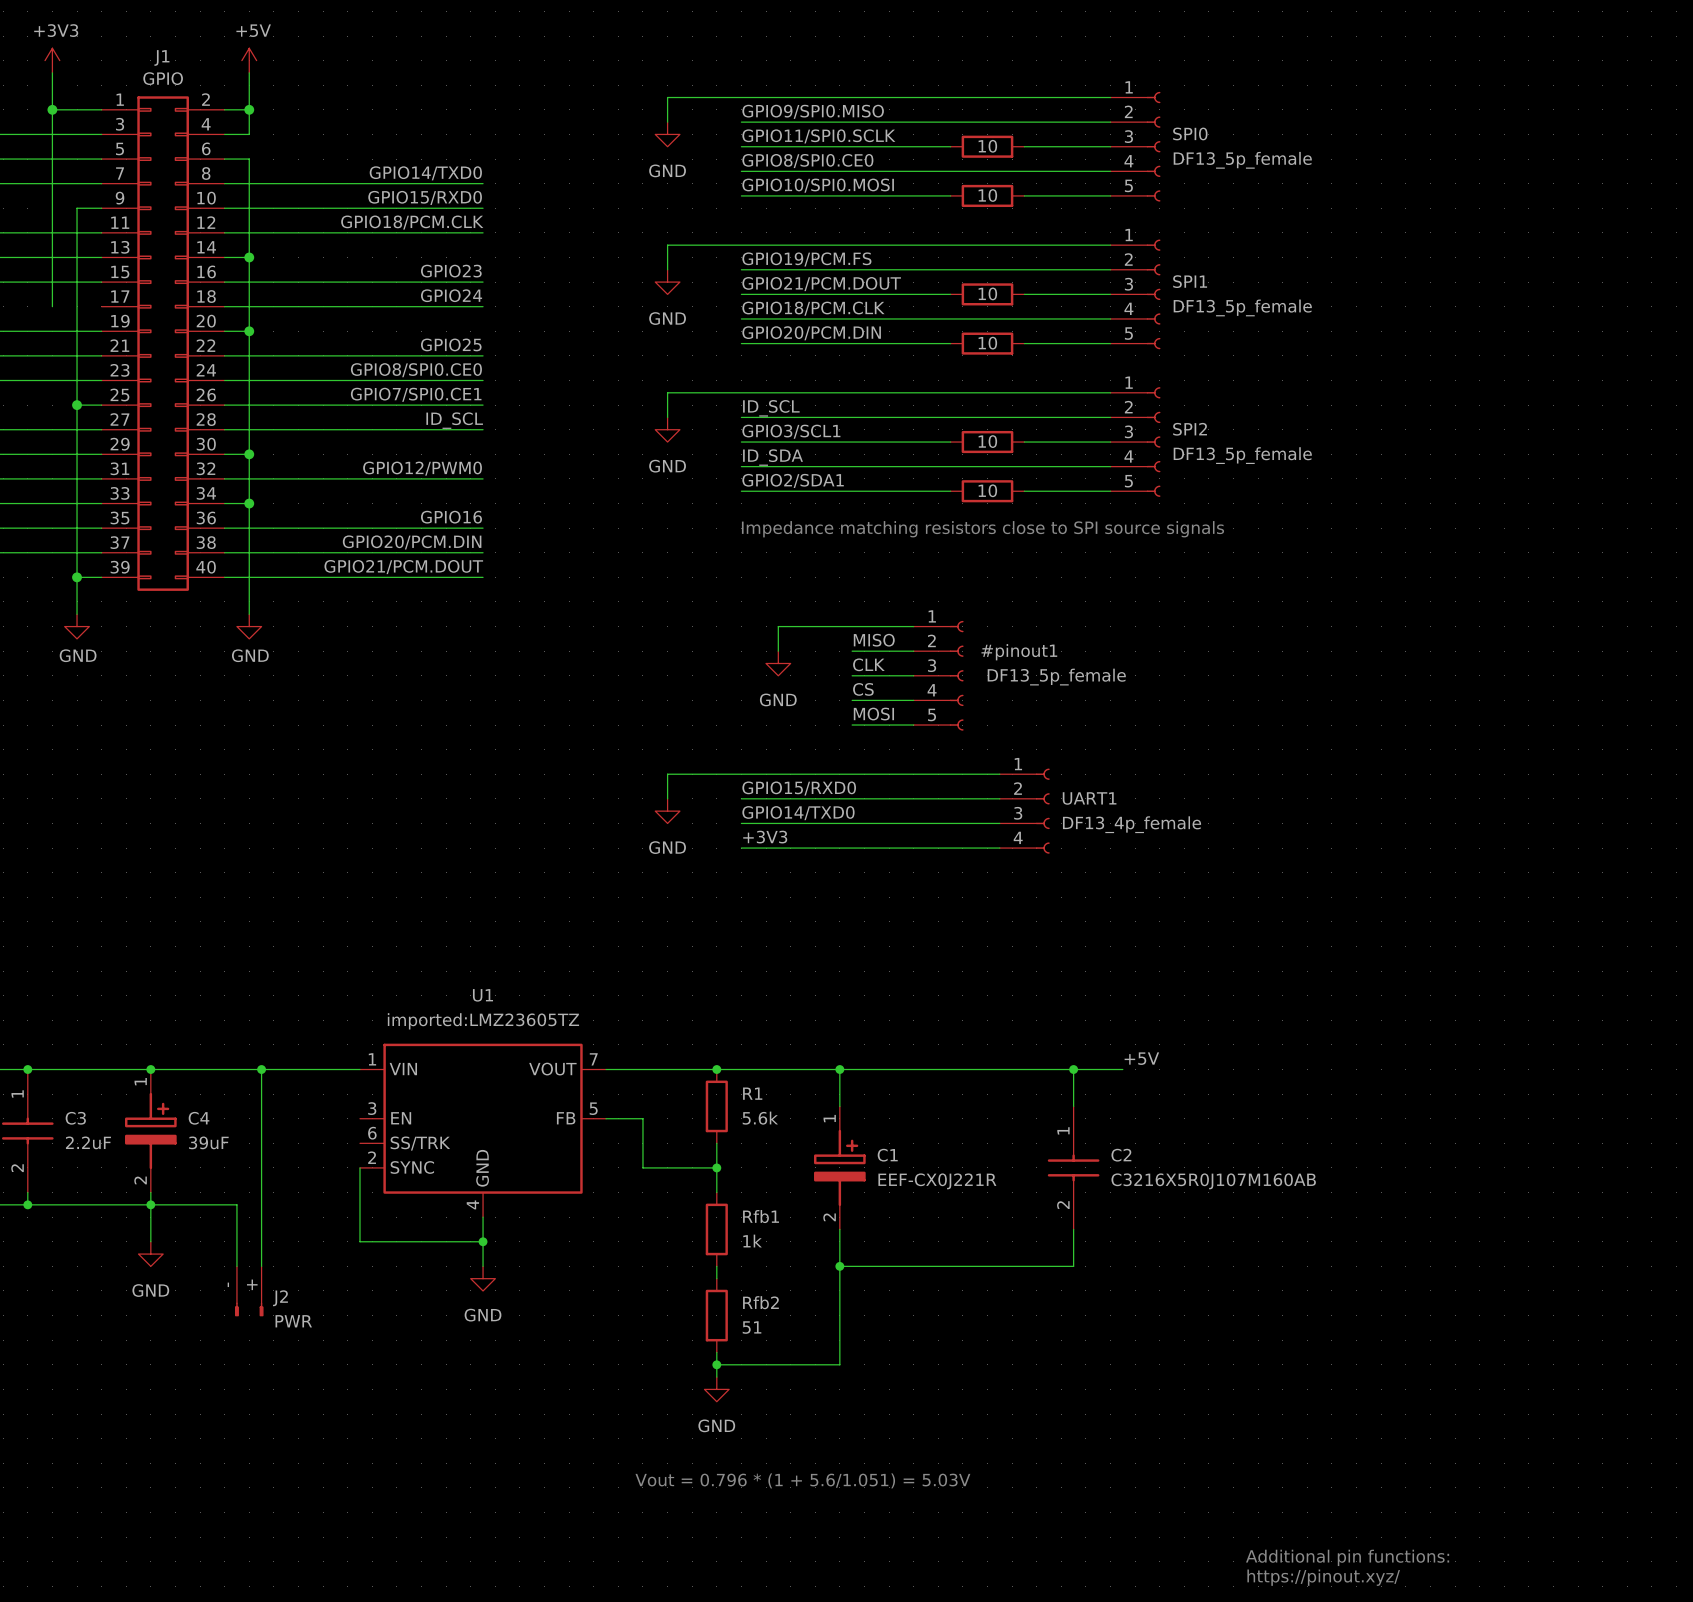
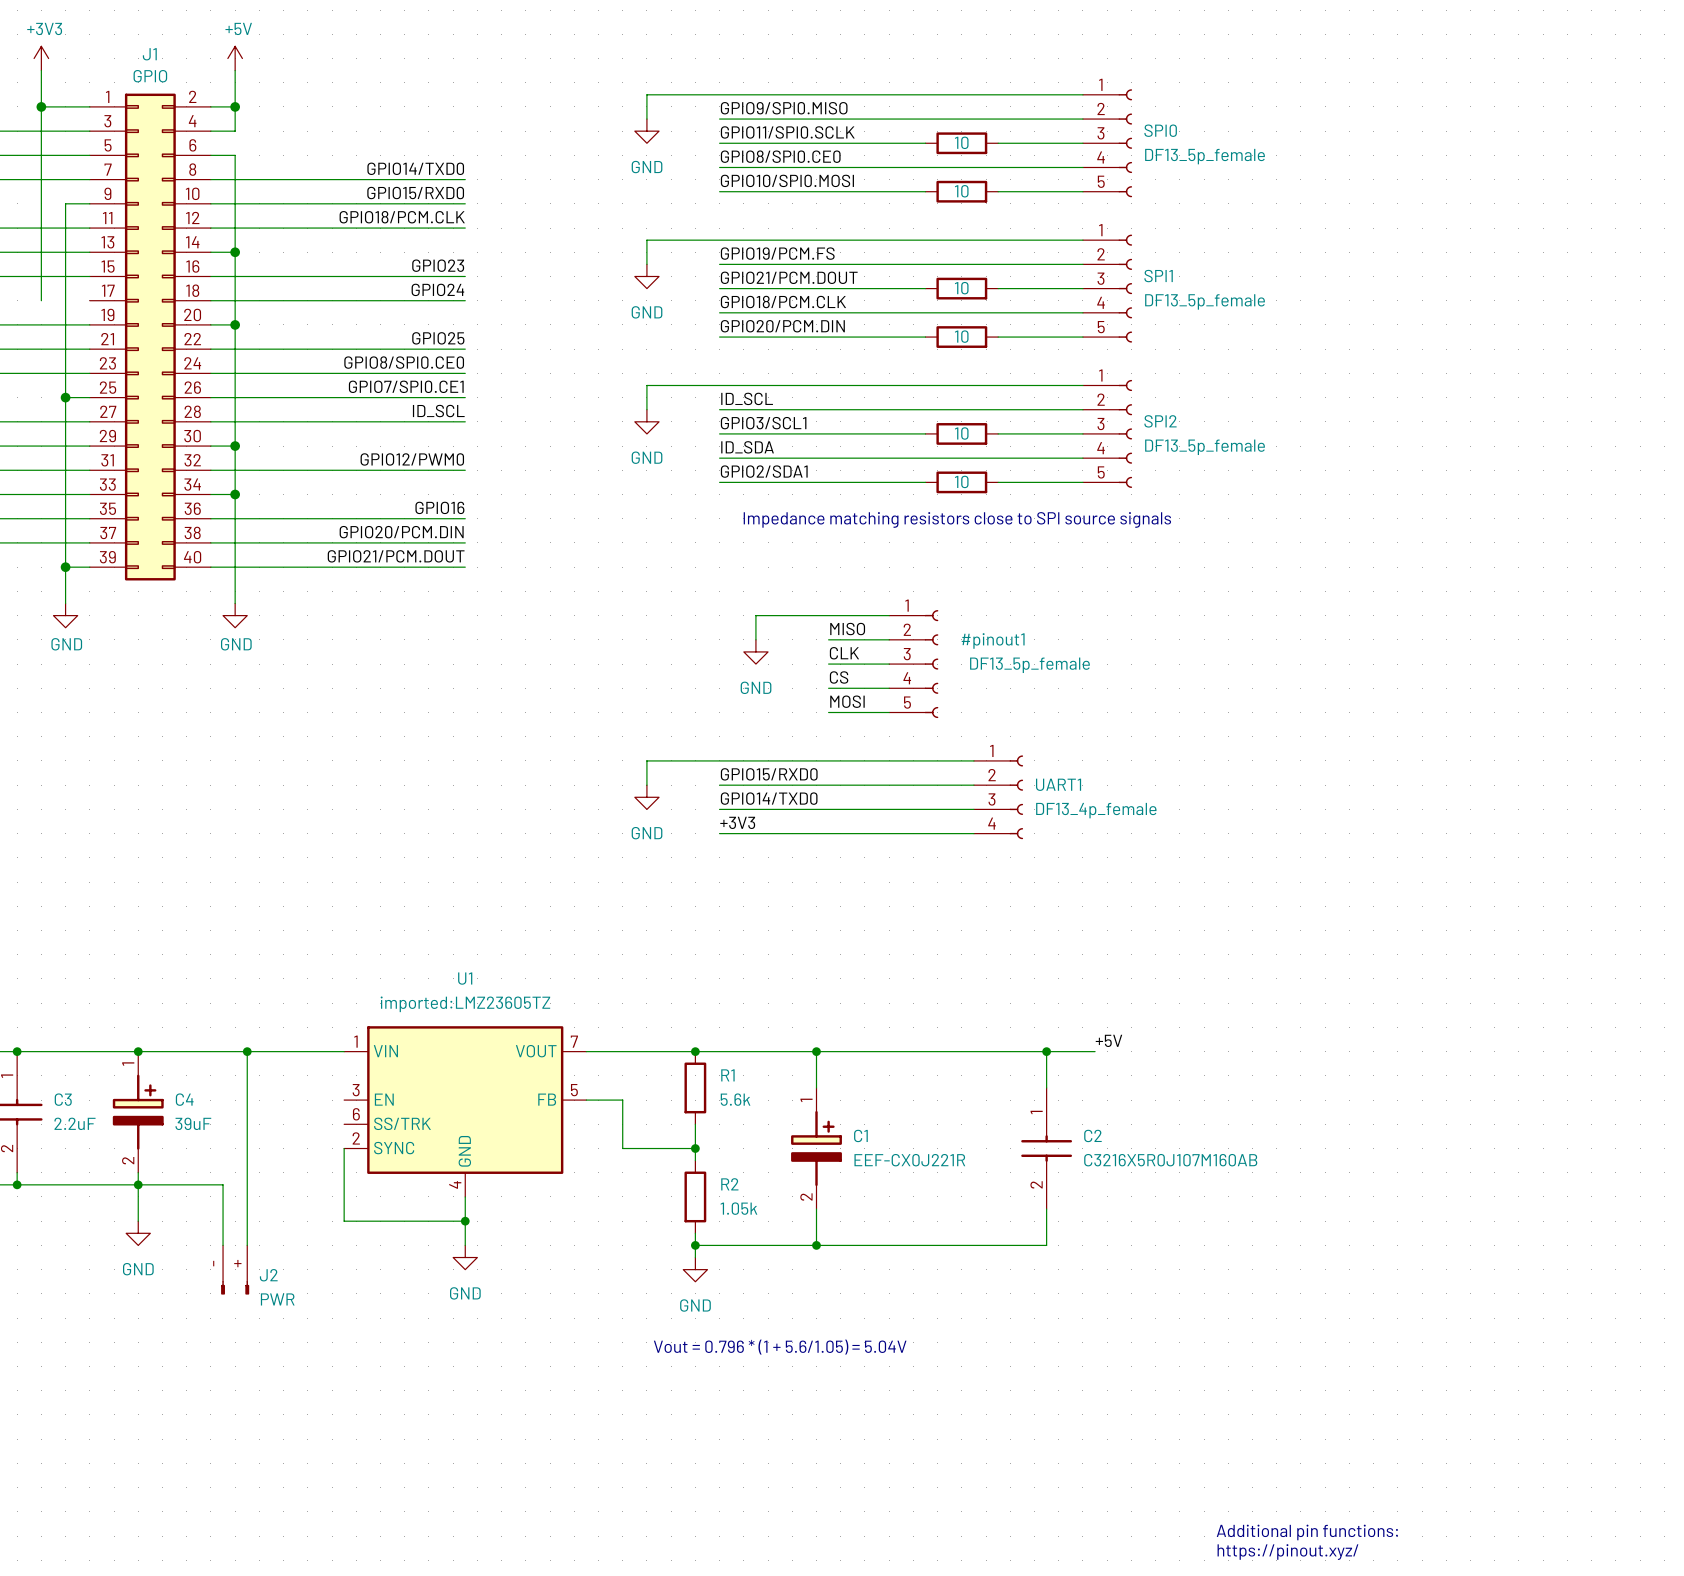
R2: none -> 1.05k (695, 1196)
Rfb1: 1k (716, 1229) -> none
junction: none -> (695, 1245)
wire: (839, 1266) (839, 1364) (716, 1364) -> (816, 1245) (695, 1245) (695, 1233)
Rfb2: 51 (716, 1315) -> none
wire: (716, 1352) (716, 1377) -> none
junction: (716, 1364) -> none
text: none -> Vout = 0.796 * (1 + 5.6/1.05) = 5.04V (780, 1347)
power symbol position: GND (716, 1389) -> GND (695, 1269)
text: Vout = 0.796 * (1 + 5.6/1.051) = 5.03V (802, 1480) -> none

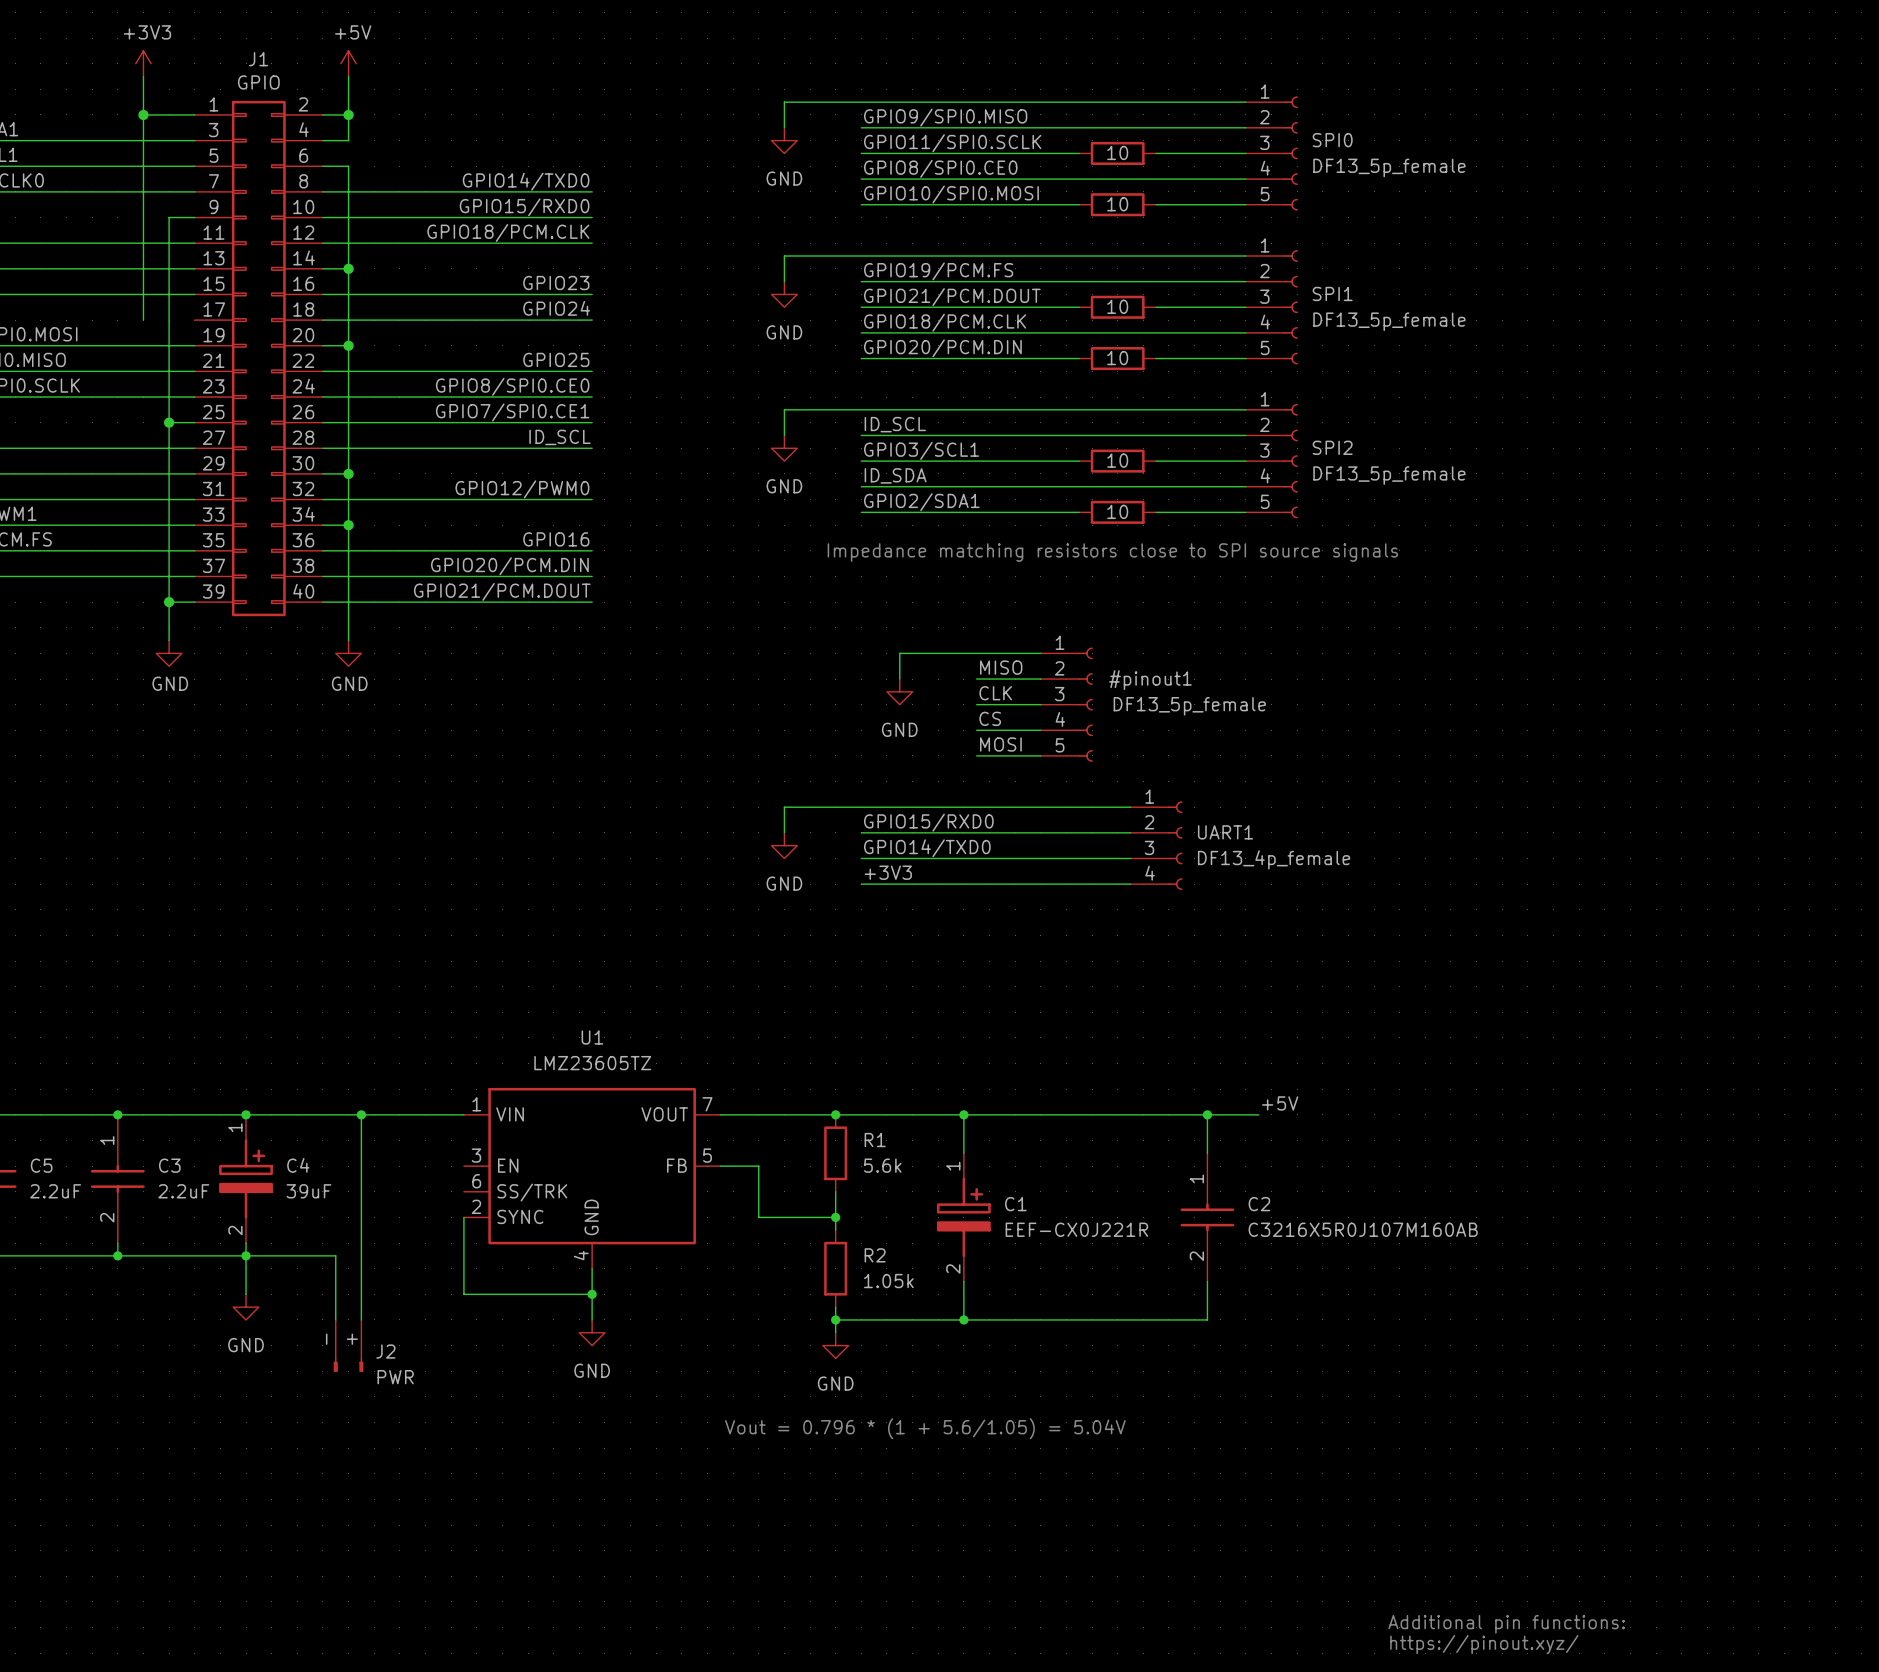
U1 value: imported:LMZ23605TZ (465, 1004) -> LMZ23605TZ (592, 1063)

